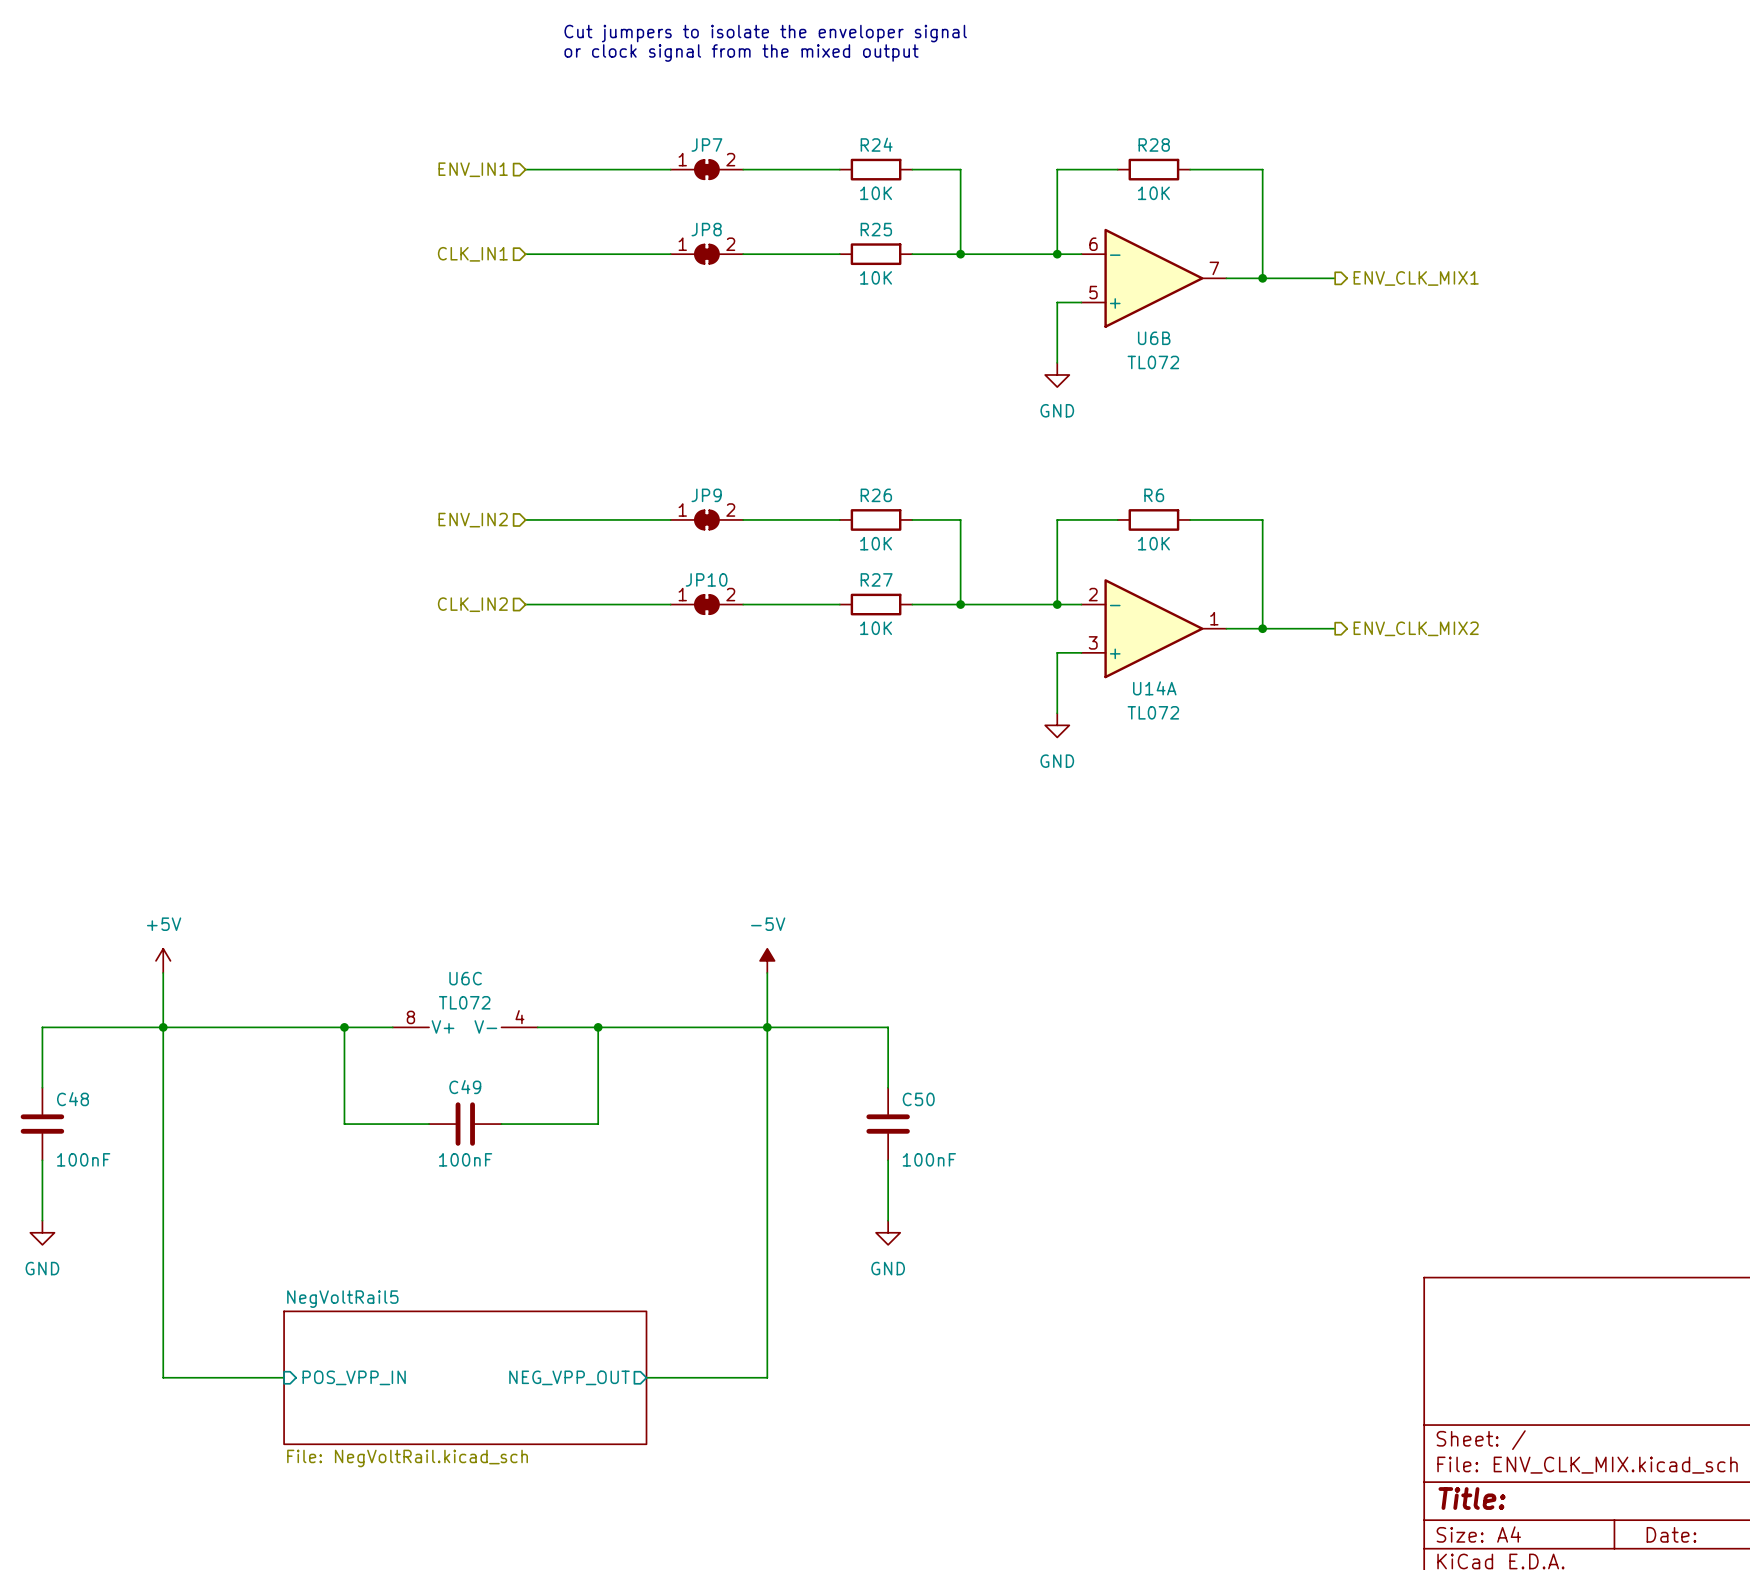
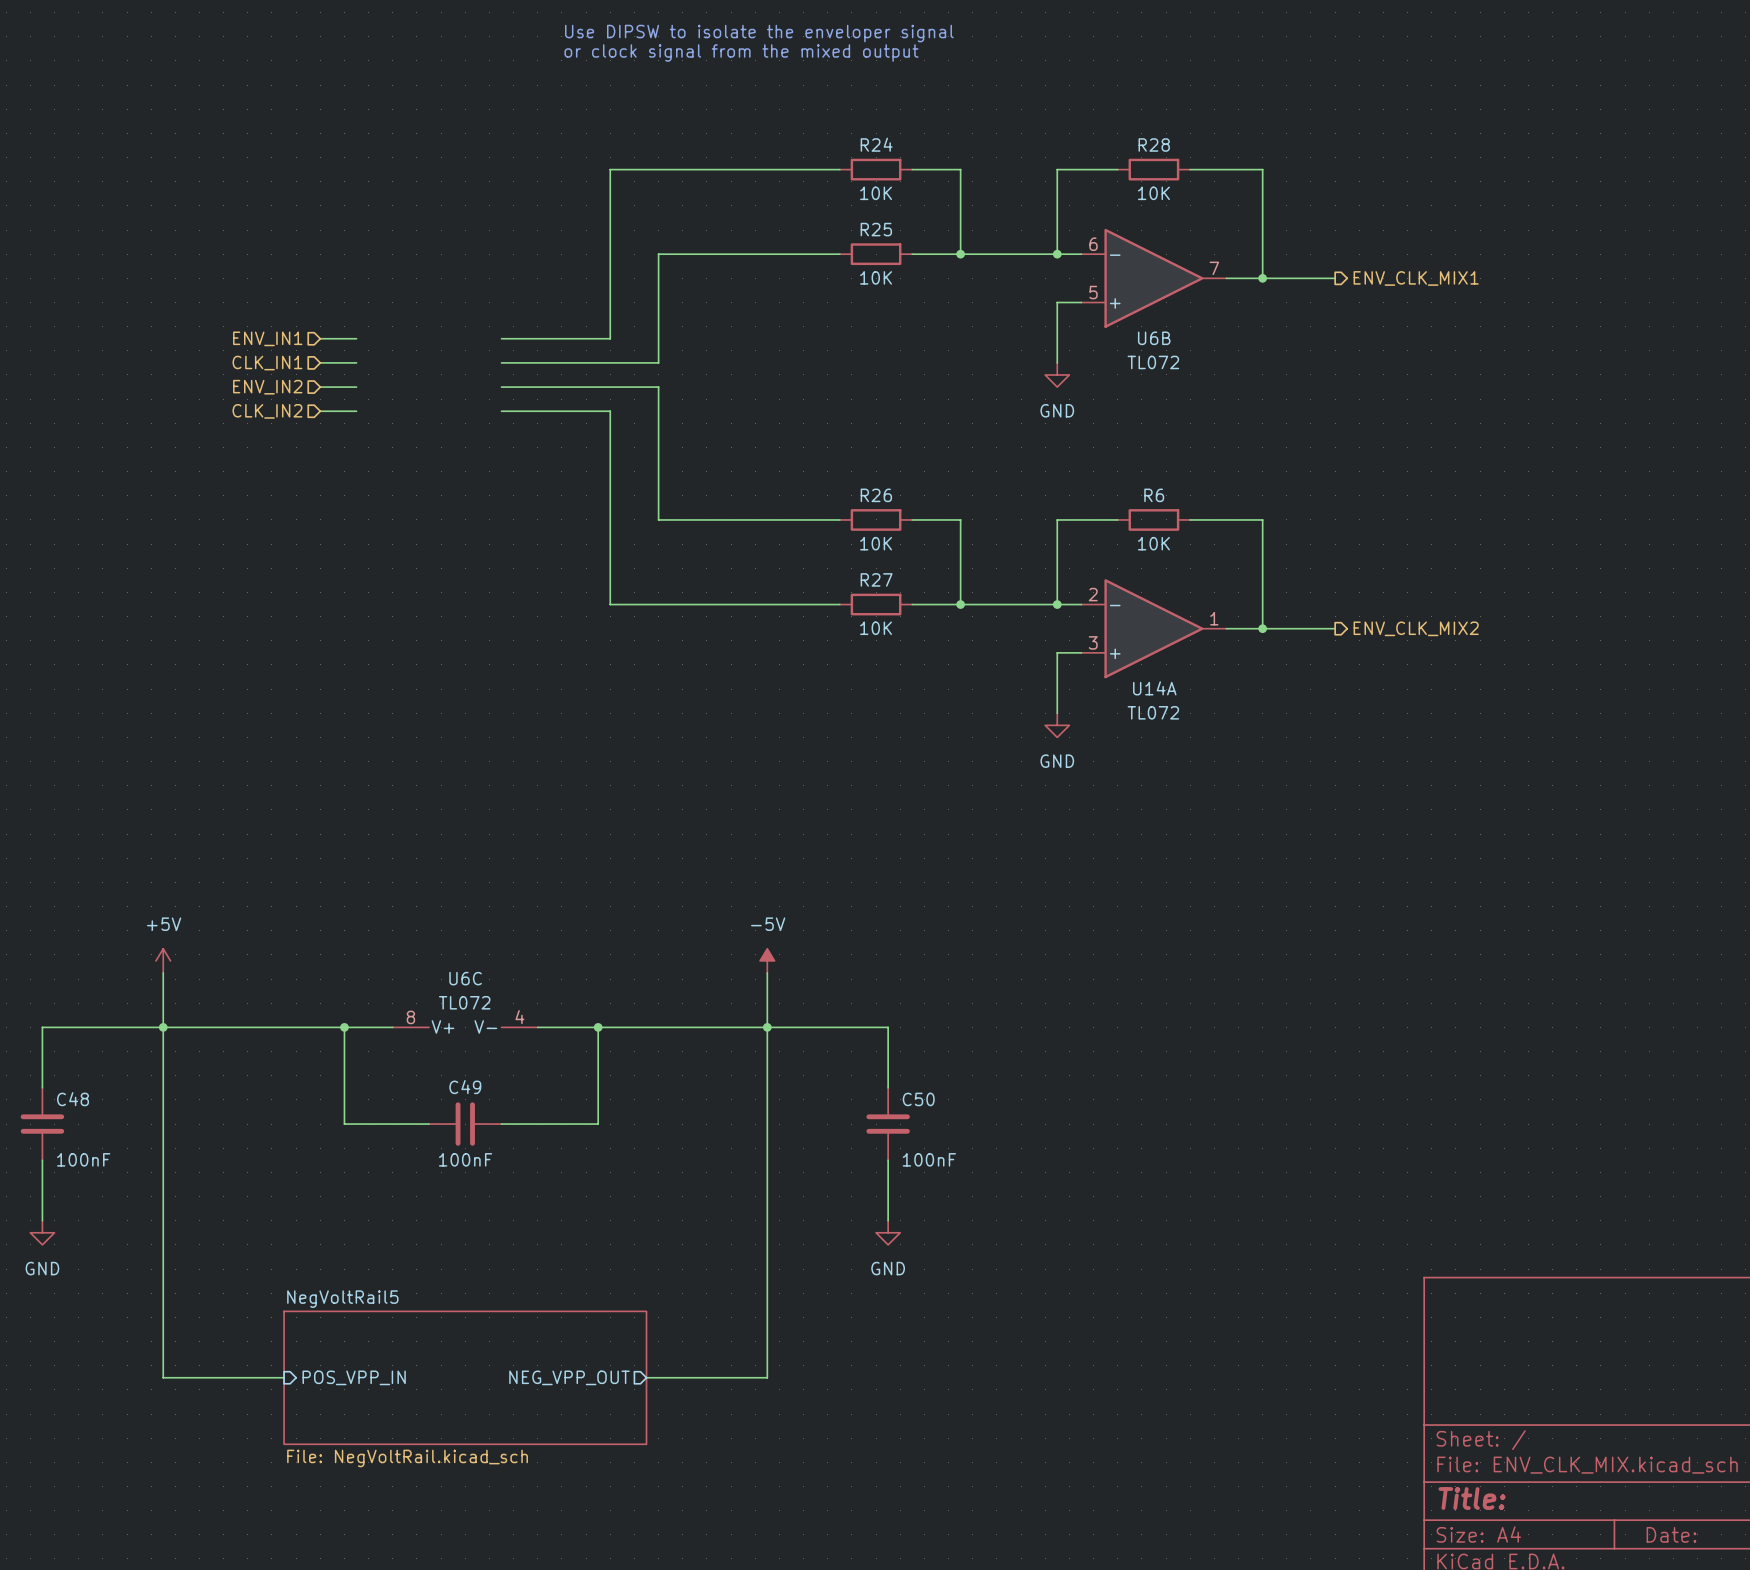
text: Cut jumpers to isolate the enveloper signal (765, 33) -> Use DIPSW to isolate the enveloper signal (759, 33)
hierarchical label: ENV_IN1 (473, 169) -> none
wire: (525, 169) (610, 169) -> (501, 338) (610, 338) (610, 169)
JP7: (706, 169) -> none
hierarchical label position: CLK_IN1 (472, 254) -> CLK_IN1 (267, 363)
wire: (525, 254) (658, 254) -> (501, 362) (658, 362) (658, 254)
JP8: (706, 254) -> none
hierarchical label: none -> ENV_IN1 (267, 338)
wire: none -> (320, 338) (356, 338)
wire: none -> (320, 362) (356, 362)
hierarchical label: none -> ENV_IN2 (267, 387)
wire: none -> (320, 387) (356, 387)
hierarchical label: none -> CLK_IN2 (267, 411)
wire: none -> (320, 411) (356, 411)
wire: (525, 519) (658, 519) -> (501, 387) (658, 387) (658, 519)
JP9: (706, 519) -> none
hierarchical label: ENV_IN2 (473, 520) -> none
hierarchical label: CLK_IN2 (472, 604) -> none
wire: (525, 604) (610, 604) -> (501, 411) (610, 411) (610, 604)
JP10: (706, 604) -> none

